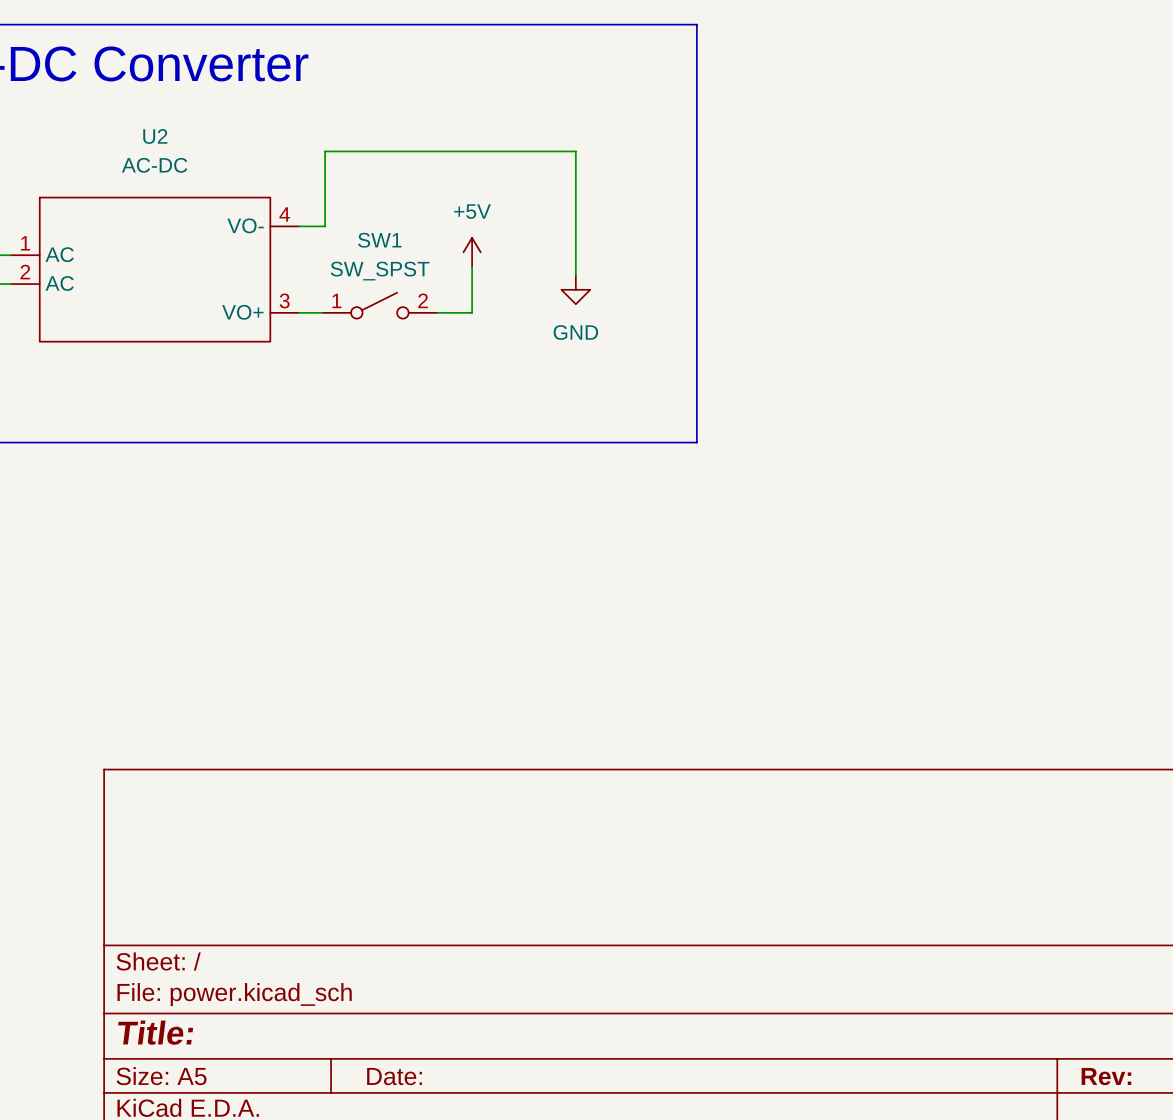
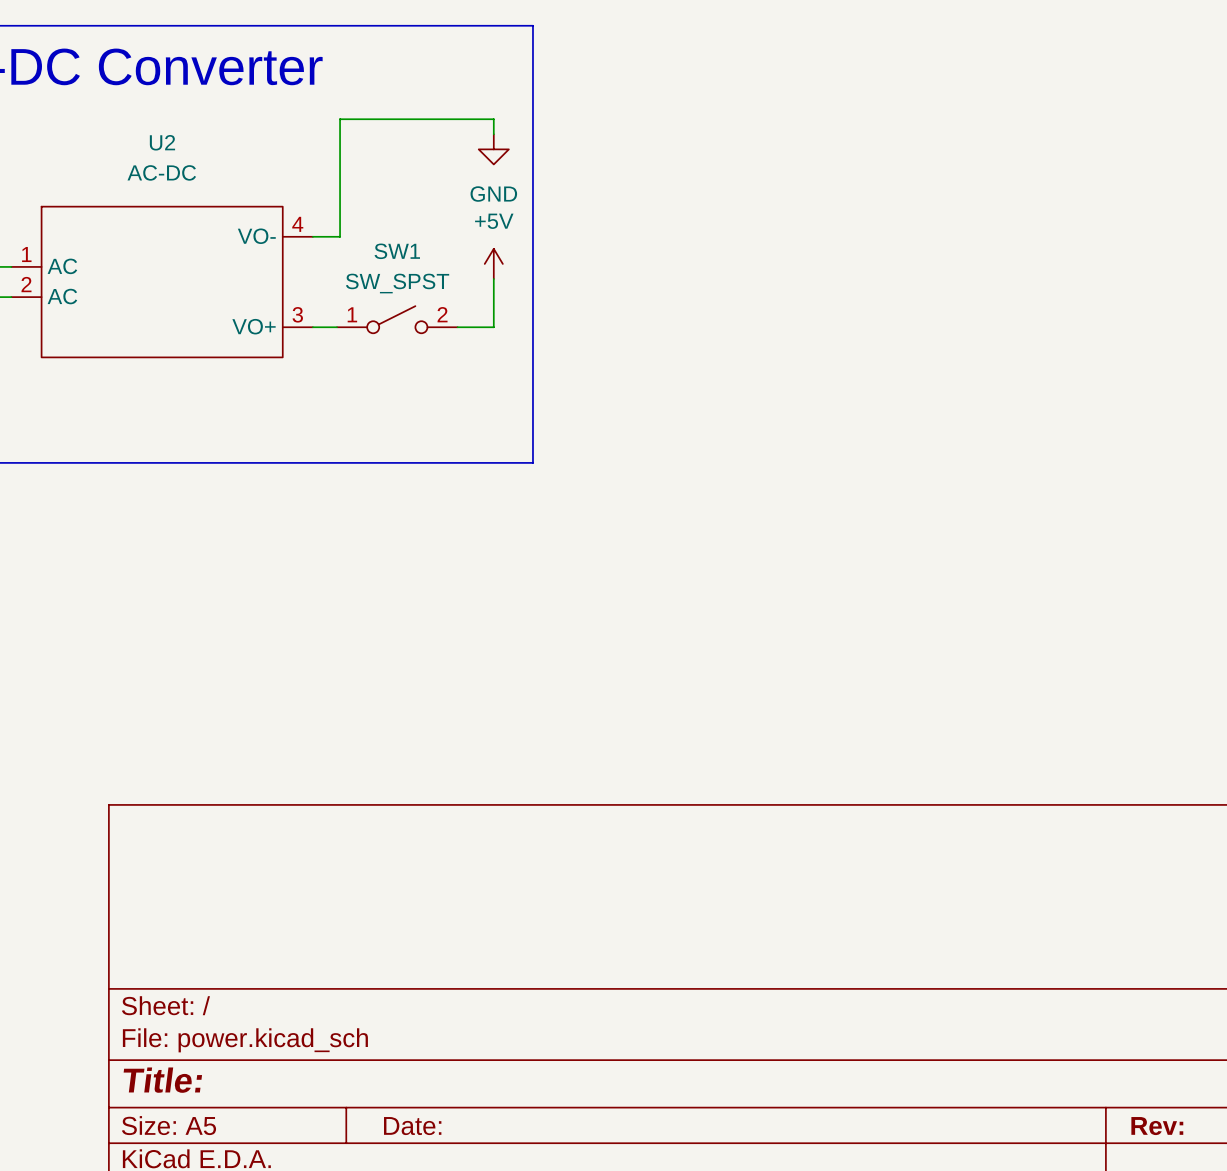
line: (509, 24) (696, 24) (696, 442) (509, 442) -> (532, 25) (532, 462)
wire: (325, 151) (575, 151) (575, 275) -> (340, 158) (340, 119) (493, 119) (493, 134)
power symbol position: GND (575, 289) -> GND (493, 149)

